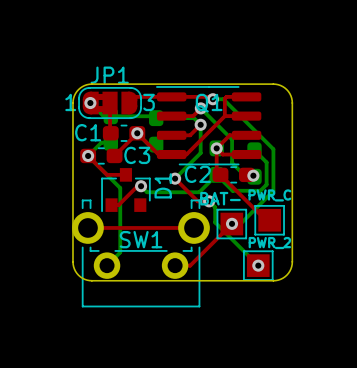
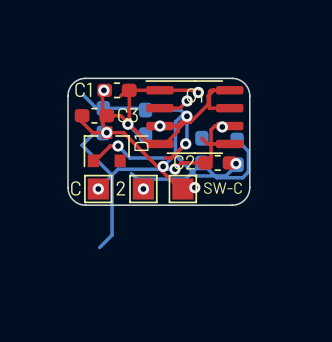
board edge: (249, 84) (280, 85) (288, 91) (292, 100) (292, 261) (289, 271) (282, 278) (273, 280) (84, 279) (76, 273) (73, 264) (72, 201) -> (232, 78) (244, 83) (249, 93) (249, 189) (247, 196) (240, 202) (232, 205) (83, 205) (73, 200) (68, 187)
top track: none -> (129, 90) (129, 118) (126, 121)
bottom track: (212, 99) (223, 99) (273, 149) (273, 190) (240, 223) (232, 223) -> none
via position: (90, 103) -> (103, 90)
JP1: (110, 103) -> none
bottom track: (200, 108) (232, 139) (232, 162) (244, 175) (254, 176) -> (185, 112) (175, 122) (175, 155) (196, 175) (225, 175) (237, 164)
top track: (224, 116) (186, 154) (177, 154) -> (213, 90) (208, 95) (208, 104) (190, 122) (184, 122) (165, 143)
top track: none -> (82, 115) (82, 122) (92, 132) (123, 132) (179, 188) (182, 188)
C1 position: (124, 133) -> (116, 90)
via: none -> (159, 126)
top track: (230, 135) (216, 148) (216, 171) (265, 220) (269, 220) -> (214, 126) (211, 129) (211, 157) (205, 162) (181, 162) (175, 169)
via: none -> (222, 126)
via: none -> (106, 132)
via: (216, 148) -> none
top track: (160, 154) (137, 133) (114, 155) -> (149, 143) (120, 115) (106, 115)
top track: none -> (185, 143) (171, 158) (165, 158)
via: none -> (185, 143)
top track: (88, 155) (107, 174) (125, 174) -> none
via: (88, 155) -> none
C3 position: (101, 155) -> (94, 115)
top track: none -> (118, 146) (110, 146) (93, 160)
bottom track: none -> (118, 146) (130, 158) (165, 158)
via: none -> (118, 146)
top track: (175, 178) (197, 201) (209, 201) -> none
bottom track: none -> (174, 169) (118, 169) (98, 188)
via: none -> (175, 169)
top track: (141, 186) (137, 186) (118, 205) (111, 205) -> none
via: (141, 186) -> none
D1 position: (125, 190) -> (106, 146)
bottom track: (209, 201) (215, 207) (215, 222) (258, 265) -> none
C: none -> (98, 188)
via: none -> (98, 188)
2: none -> (143, 188)
via: none -> (143, 188)
SW-C: none -> (182, 188)
PWR_C: (269, 220) -> none
top track: (232, 223) (190, 265) (175, 265) -> none
via: (232, 223) -> none
BAT-: (231, 224) -> none
top track: (87, 227) (194, 227) -> none
SW1: (140, 253) -> none
PWR_2: (258, 265) -> none
via: (258, 265) -> none

